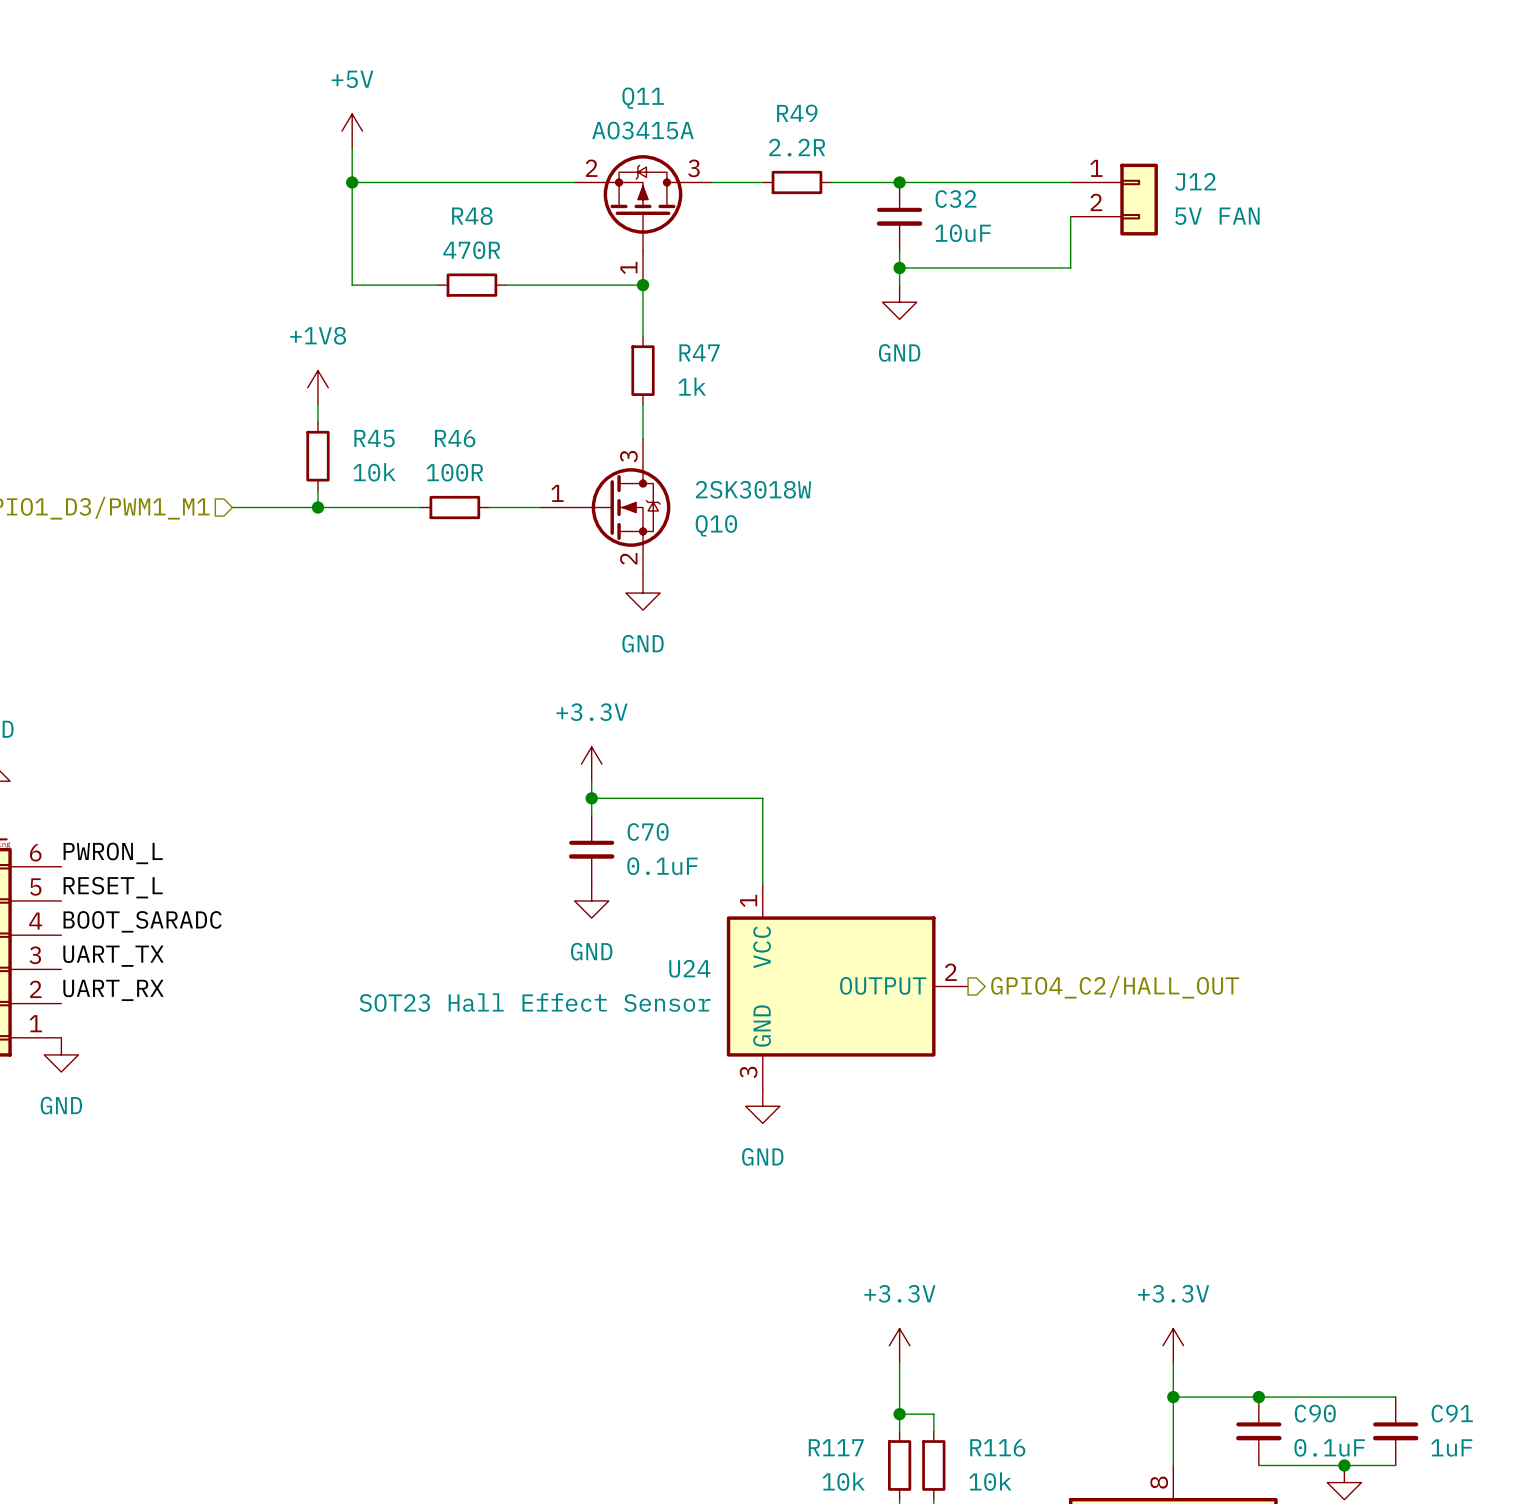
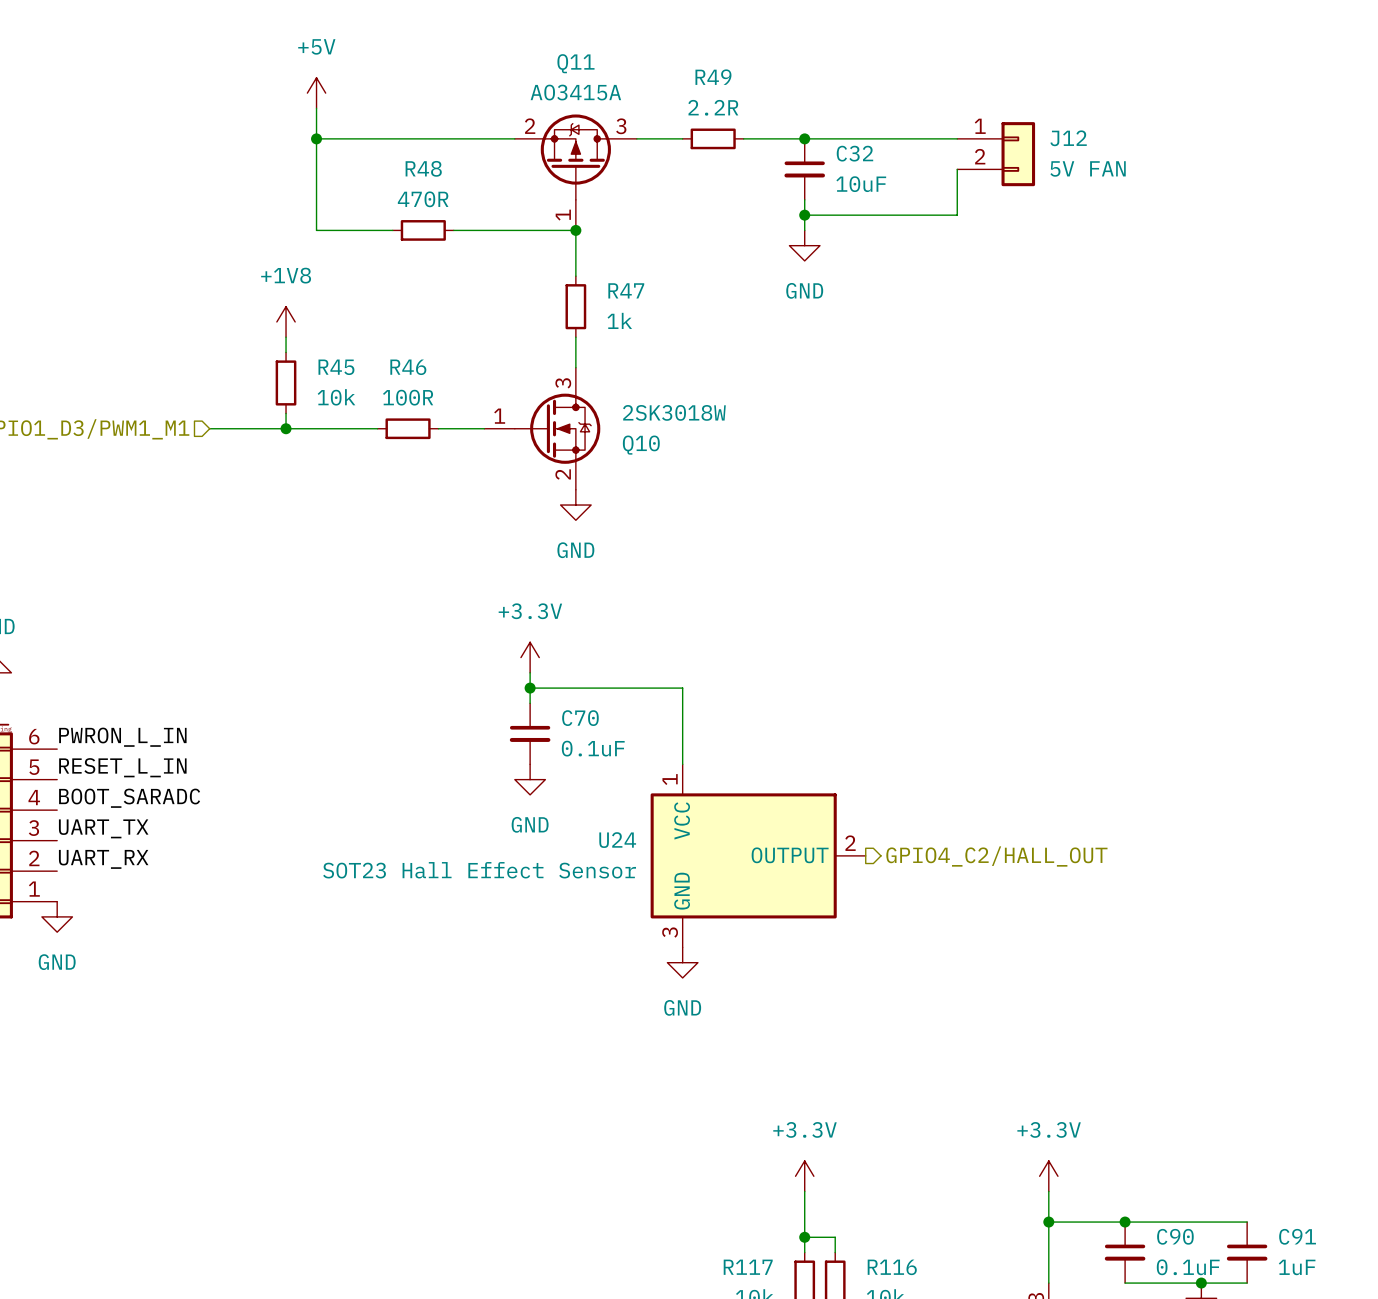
label: PWRON_L (113, 853) -> PWRON_L_IN (122, 737)
label: RESET_L (113, 887) -> RESET_L_IN (122, 767)

